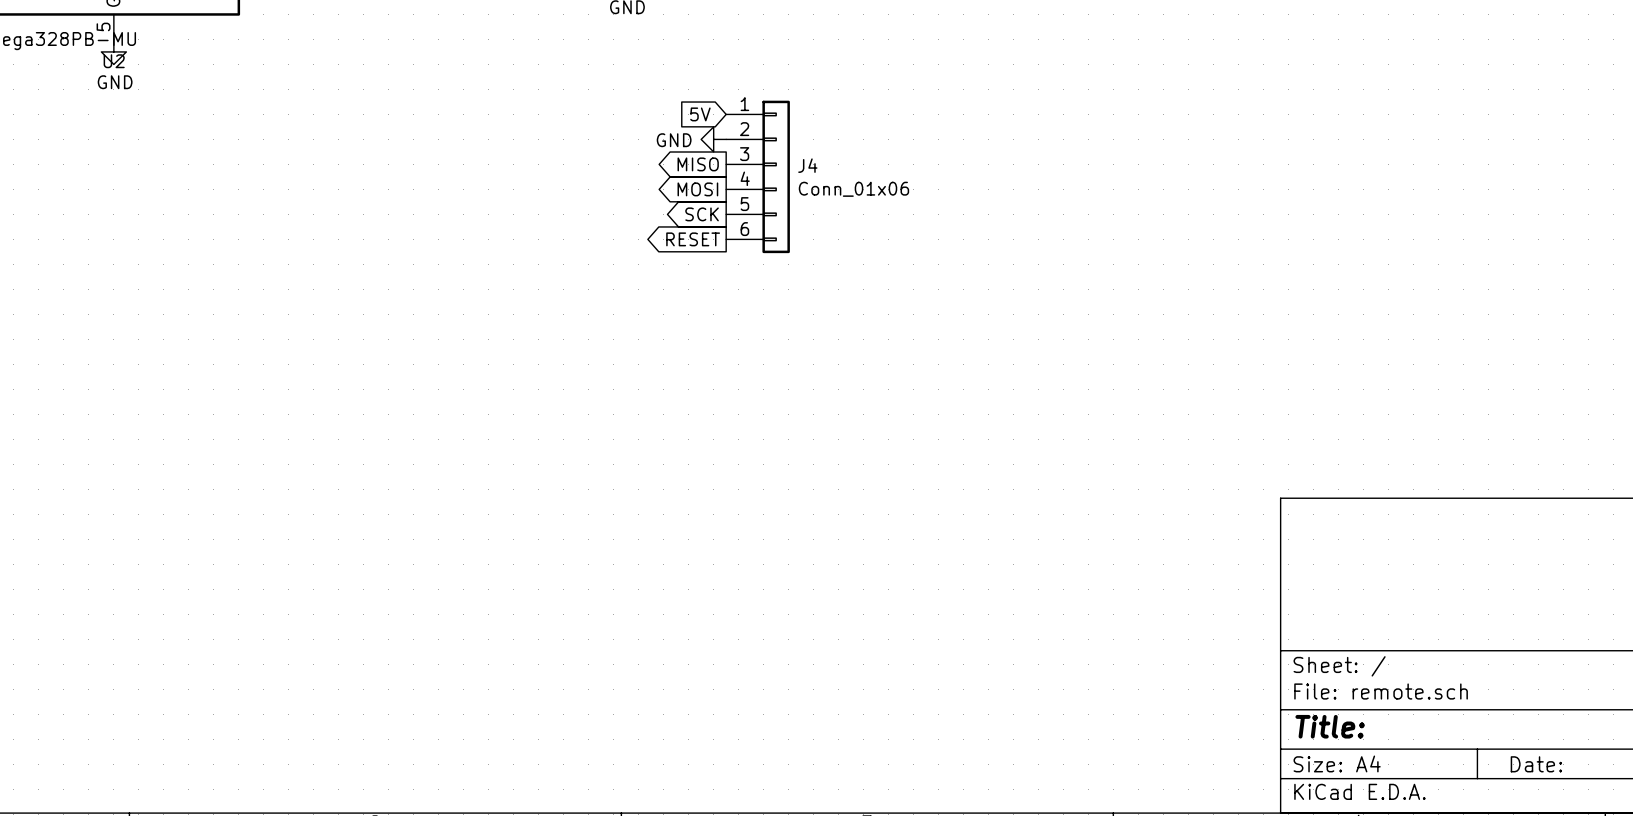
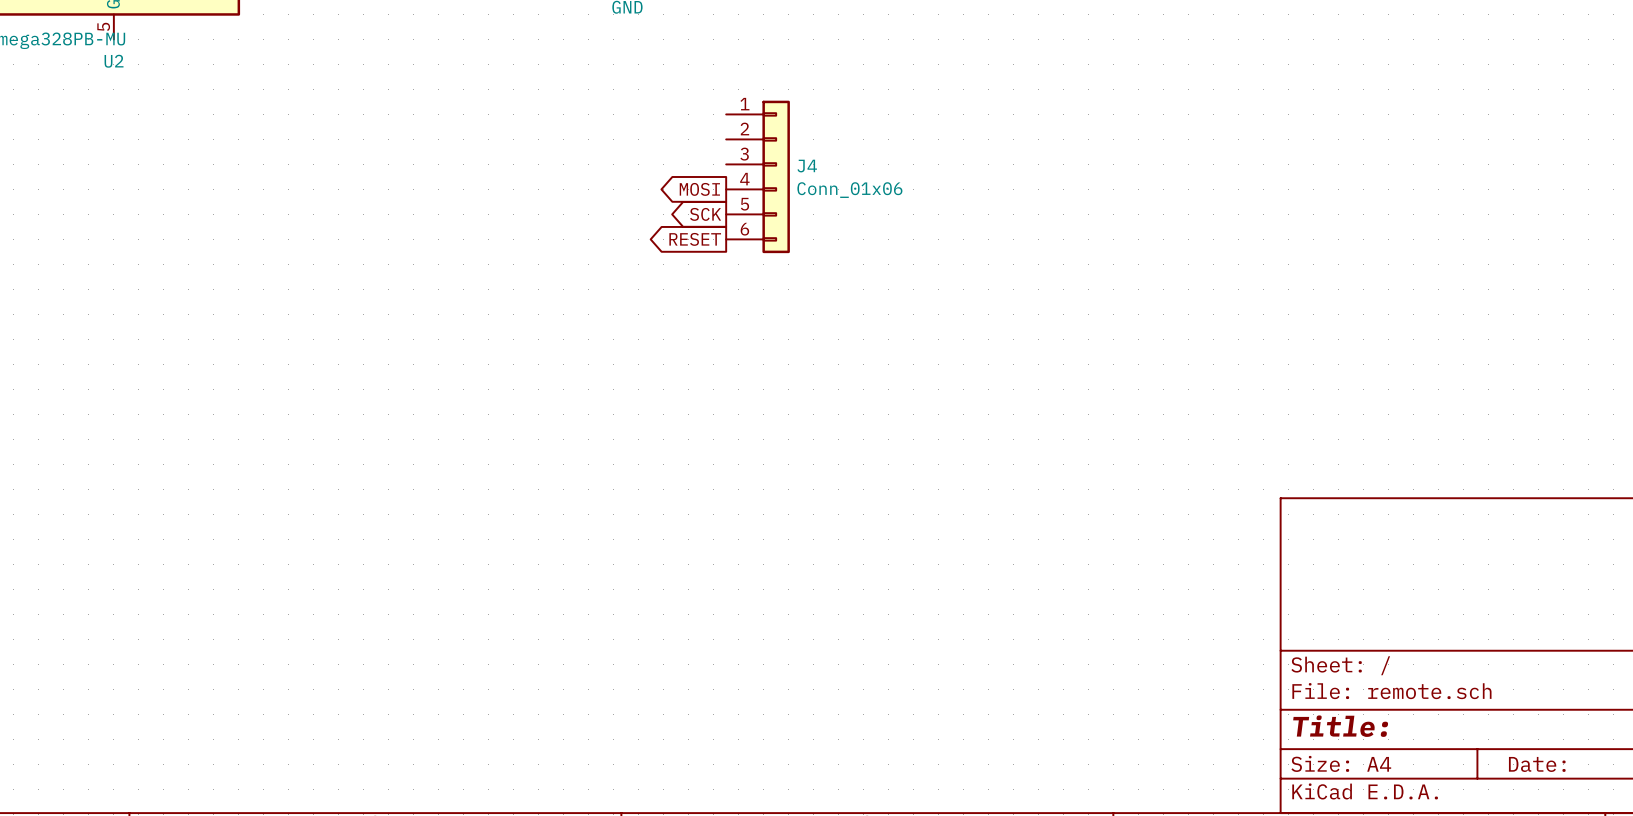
power symbol: GND (113, 51) -> none
global label: 5V (700, 114) -> none
power symbol: GND (713, 139) -> none
global label: MISO (698, 164) -> none

